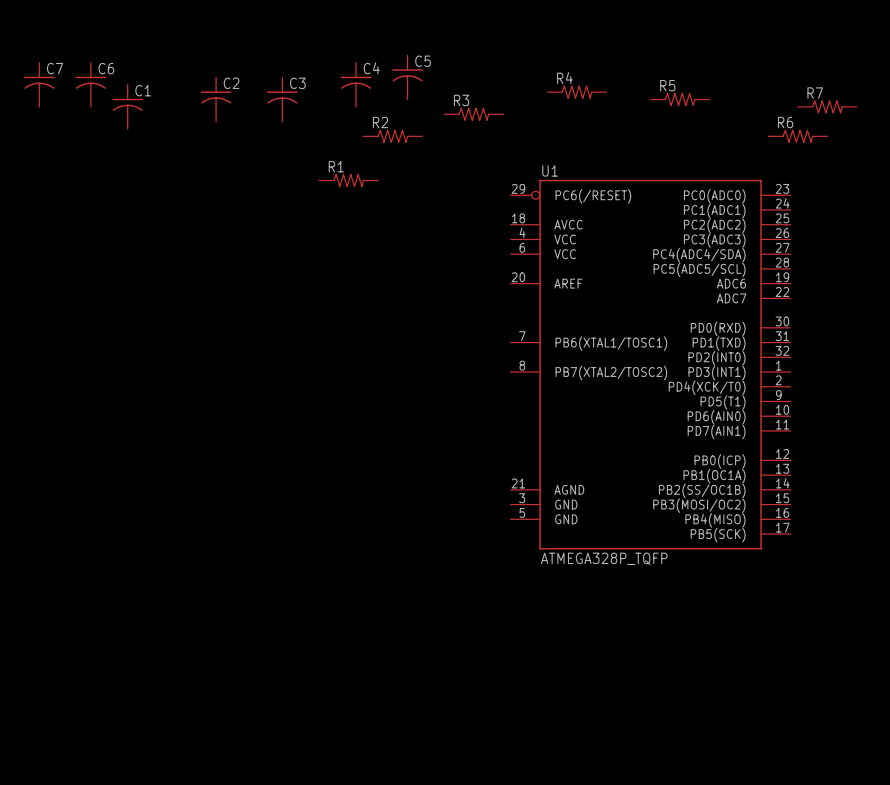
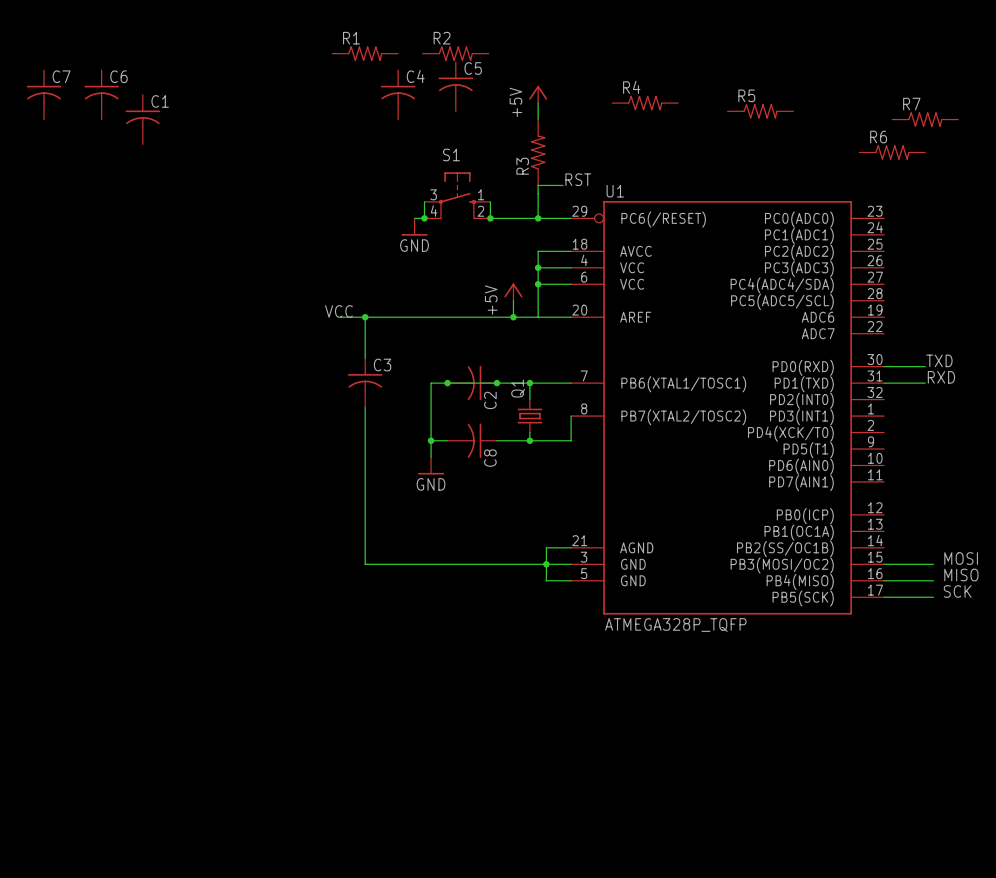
power symbol: none -> +5V (538, 94)
wire: none -> (538, 103) (538, 119)
C2 rotation: 0° (216, 99) -> 90° clockwise (472, 383)
C2 position: (216, 99) -> (472, 383)
C3 position: (282, 99) -> (365, 383)
R3 rotation: 0° (473, 114) -> 90° counterclockwise (538, 152)
R2 position: (392, 136) -> (455, 53)
label: none -> RST (578, 179)
wire: none -> (562, 185) (538, 185) (538, 218)
S1: none -> (457, 195)
R1 position: (348, 180) -> (365, 53)
wire: none -> (424, 201) (424, 218) (414, 218)
wire: none -> (490, 201) (490, 218) (571, 218)
junction: none -> (424, 218)
junction: none -> (490, 218)
junction: none -> (538, 218)
power symbol: none -> GND (414, 227)
wire: none -> (571, 251) (538, 251) (538, 317)
wire: none -> (538, 267) (571, 267)
junction: none -> (538, 267)
wire: none -> (538, 284) (571, 284)
junction: none -> (538, 284)
power symbol: none -> +5V (513, 292)
wire: none -> (513, 300) (513, 317)
label: none -> VCC (338, 311)
wire: none -> (340, 317) (571, 317)
wire: none -> (365, 317) (365, 358)
junction: none -> (365, 317)
junction: none -> (513, 317)
label: none -> TXD (939, 360)
wire: none -> (884, 366) (925, 366)
label: none -> RXD (941, 377)
junction: none -> (447, 383)
junction: none -> (496, 383)
wire: none -> (529, 383) (529, 399)
junction: none -> (529, 383)
wire: none -> (571, 383) (431, 383) (431, 457)
wire: none -> (884, 383) (925, 383)
wire: none -> (365, 407) (365, 564) (571, 564)
Q1: none -> (529, 416)
wire: none -> (571, 416) (571, 440) (496, 440)
wire: none -> (529, 432) (529, 440)
wire: none -> (431, 440) (447, 440)
junction: none -> (431, 440)
C8: none -> (472, 440)
junction: none -> (529, 440)
power symbol: none -> GND (431, 465)
wire: none -> (571, 547) (546, 547) (546, 580) (571, 580)
label: none -> MOSI (961, 558)
junction: none -> (546, 564)
wire: none -> (884, 564) (933, 564)
label: none -> MISO (961, 575)
wire: none -> (884, 580) (933, 580)
label: none -> SCK (957, 591)
wire: none -> (884, 597) (933, 597)

